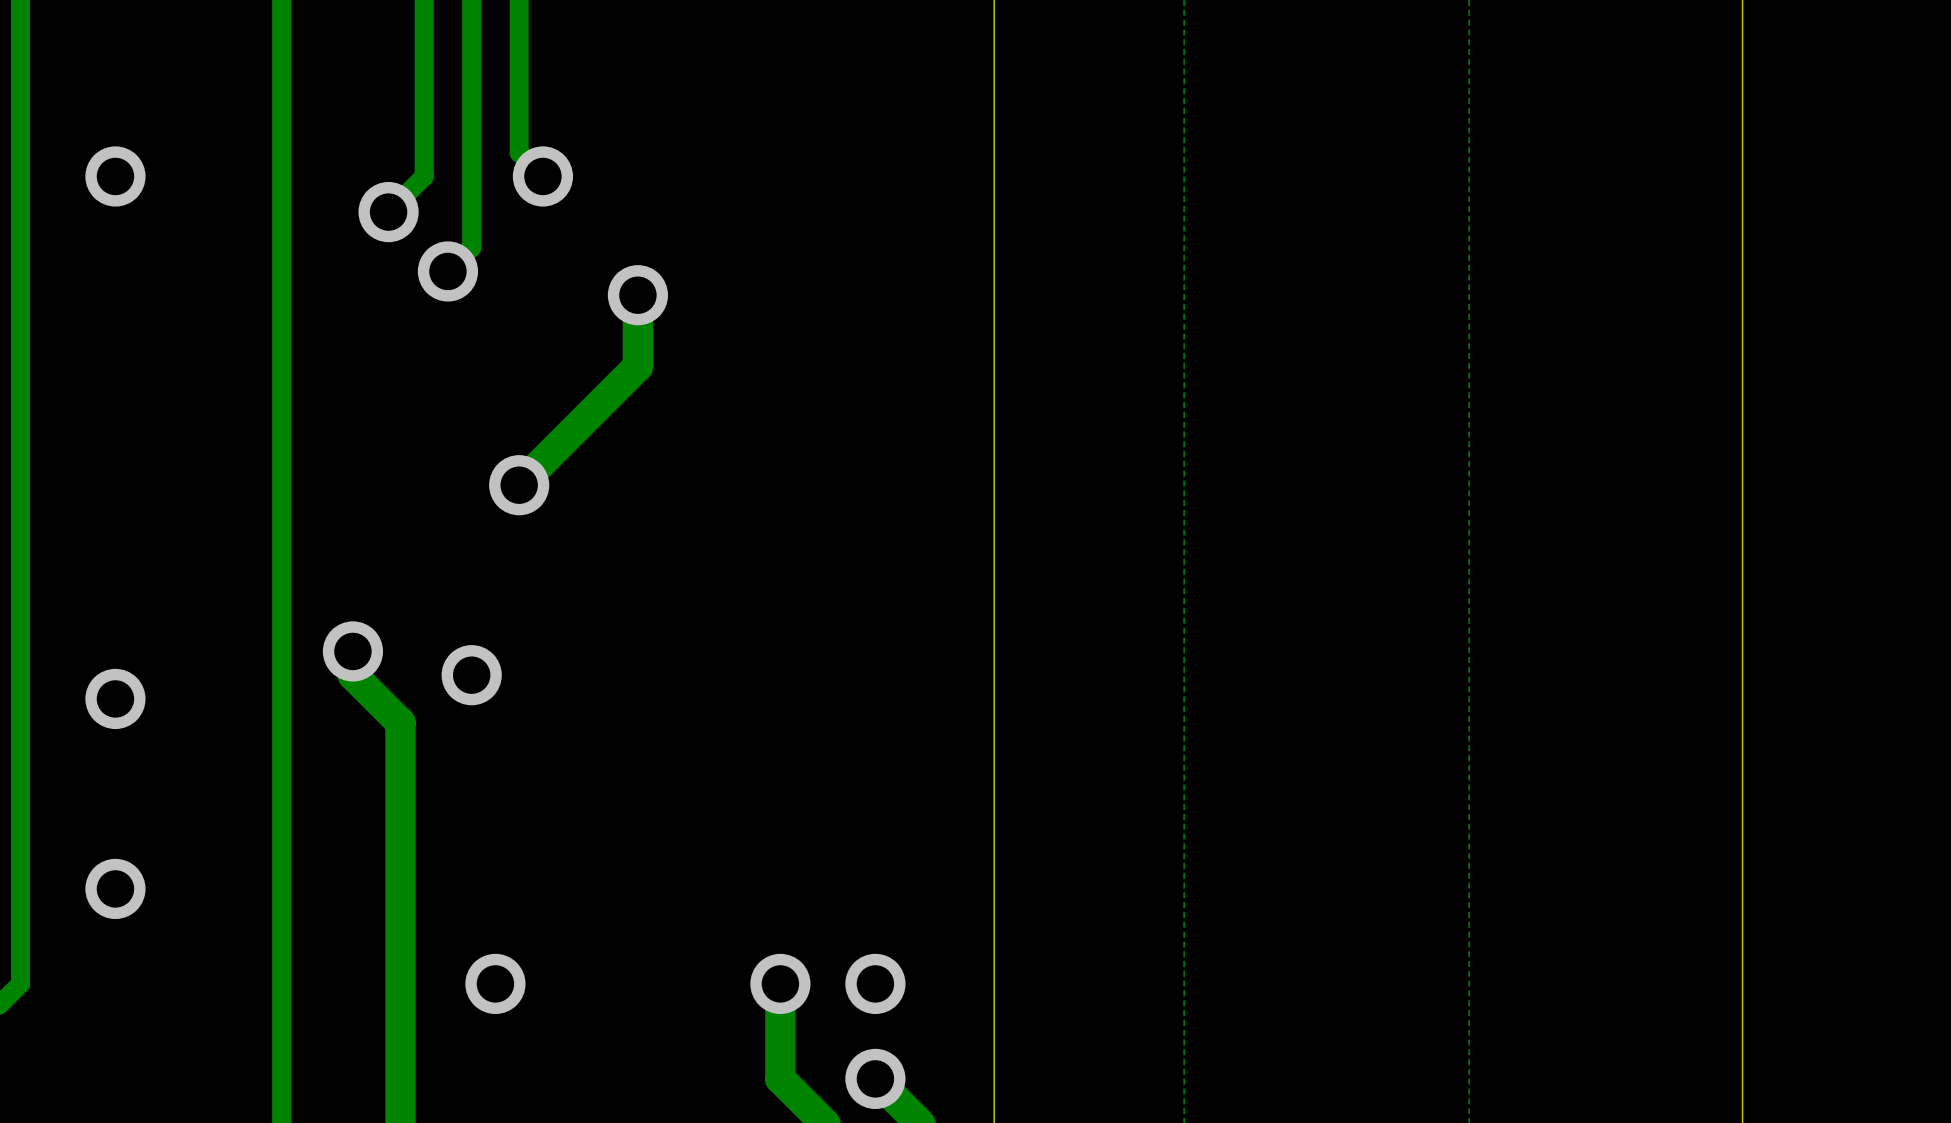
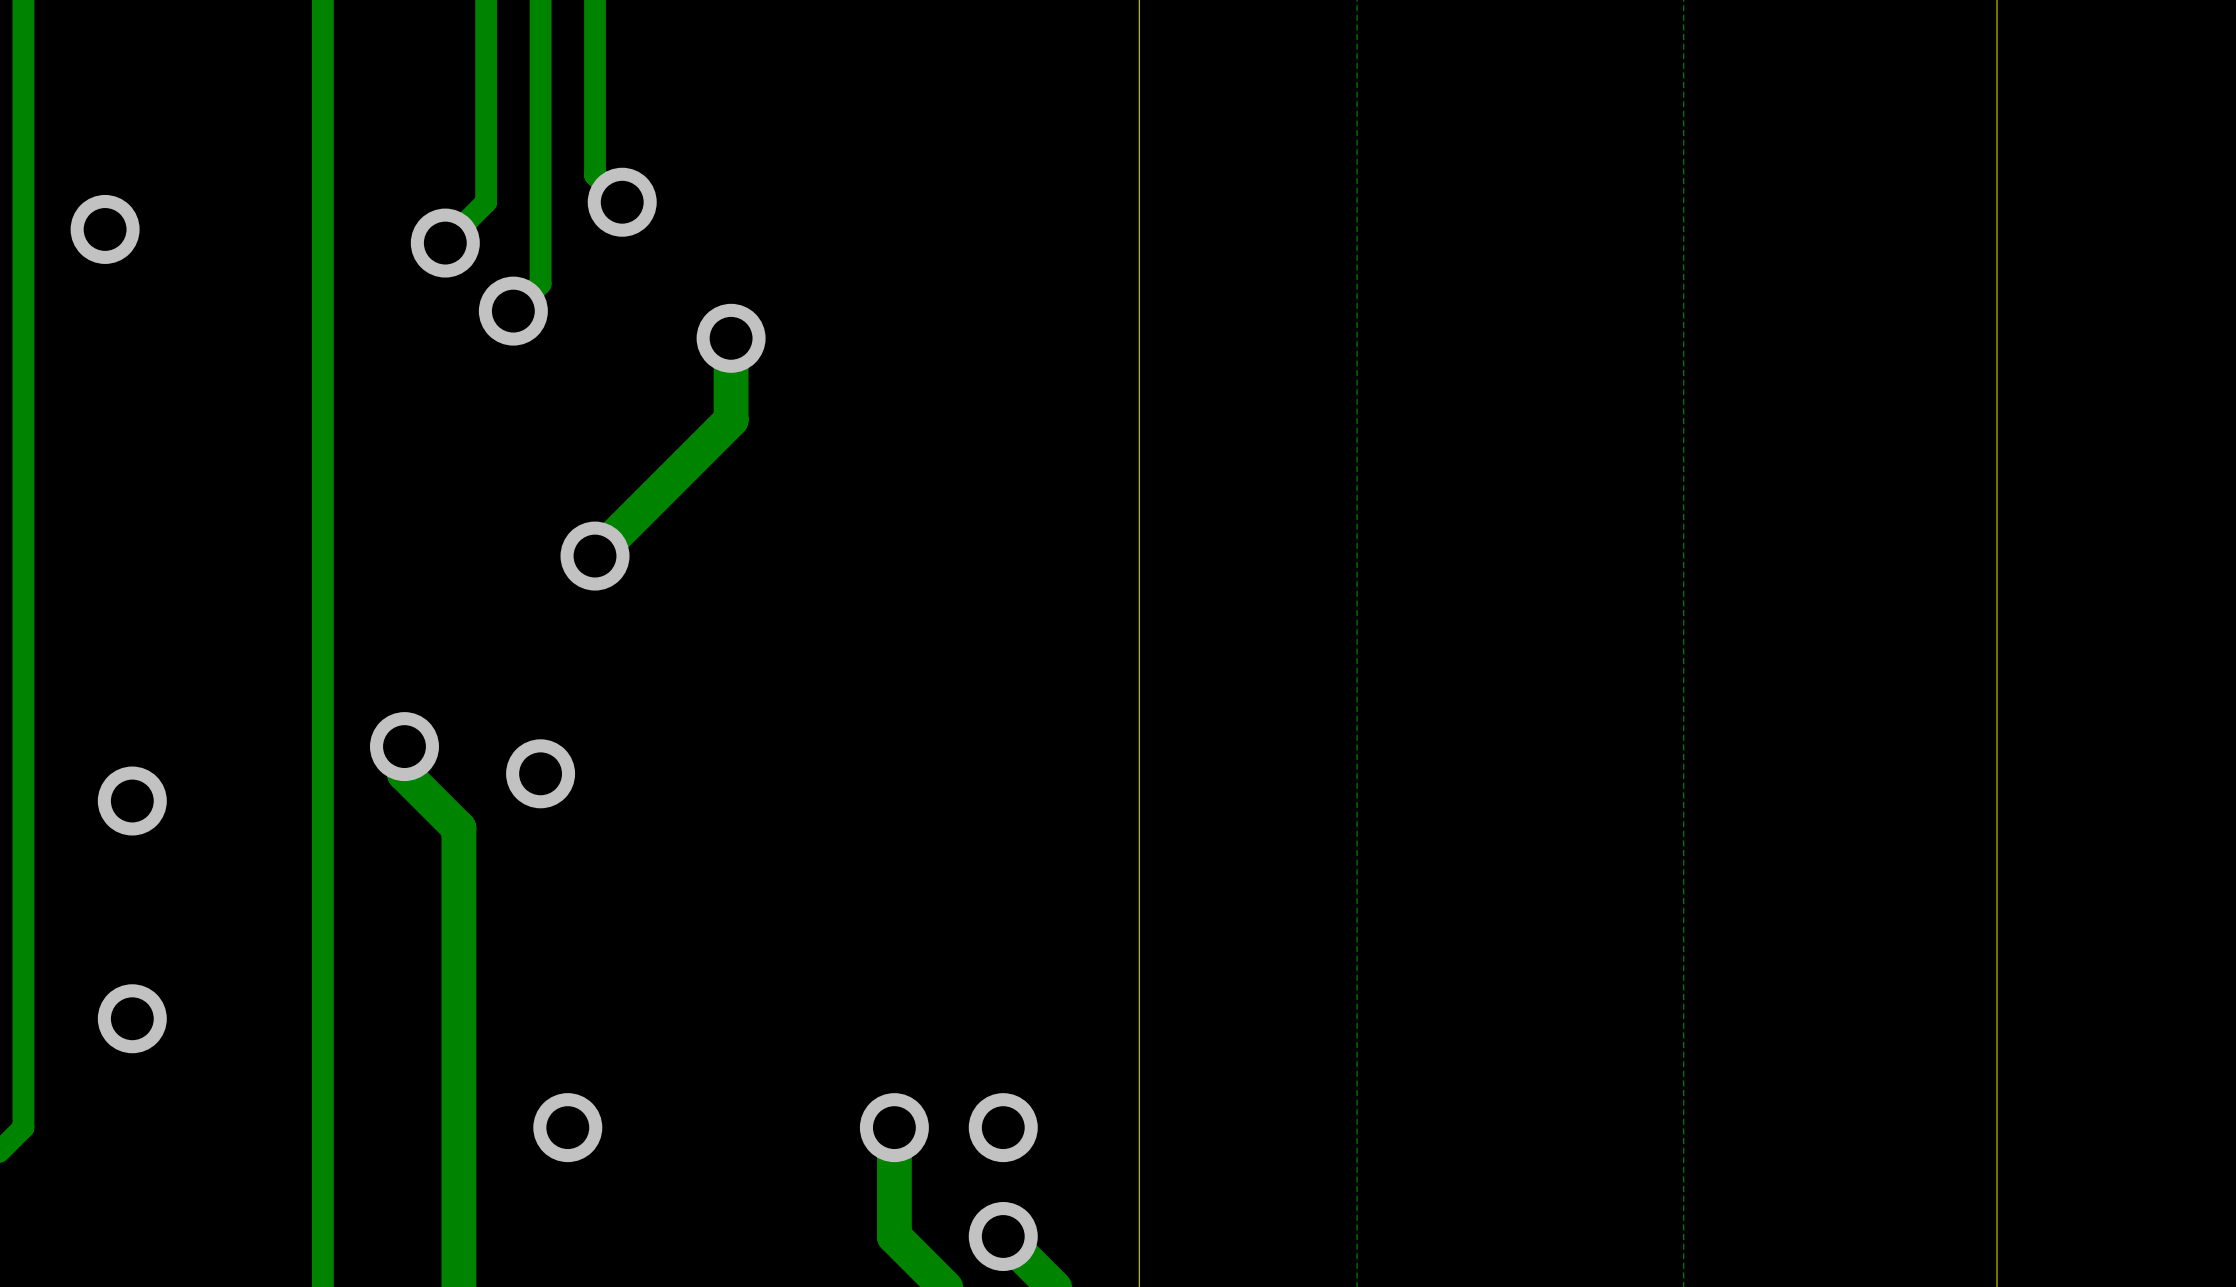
via position: (115, 176) -> (105, 229)

